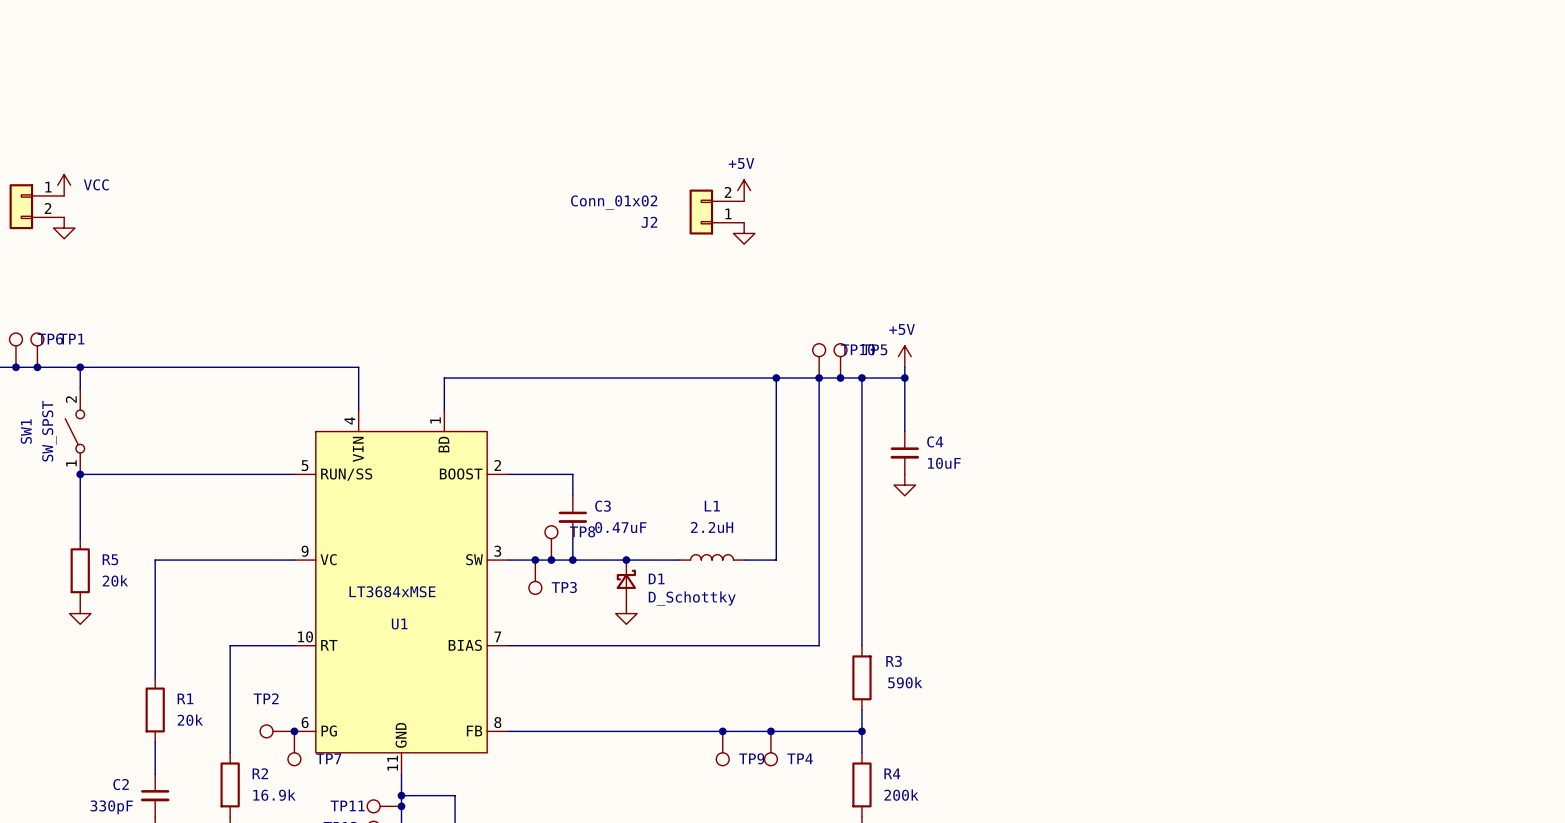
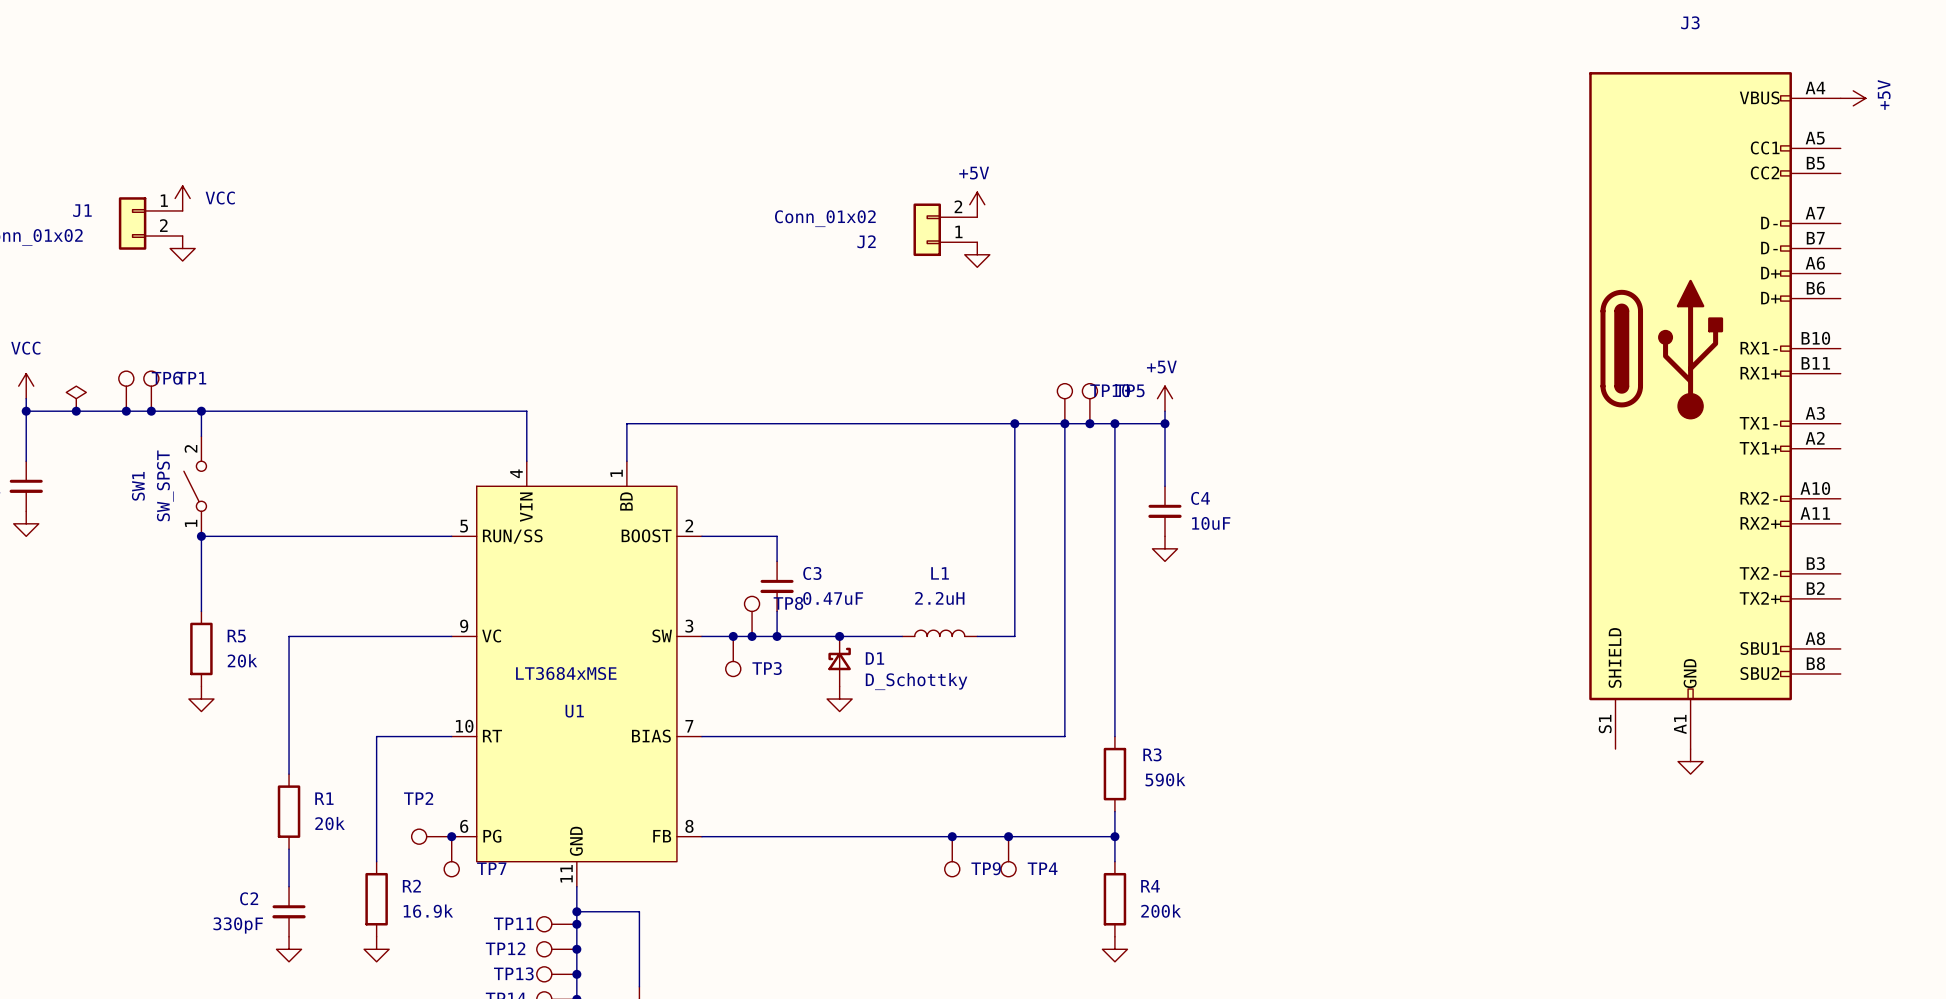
power symbol: none -> +5V (1853, 98)
J3: none -> (1714, 410)
power symbol: none -> (1690, 761)

